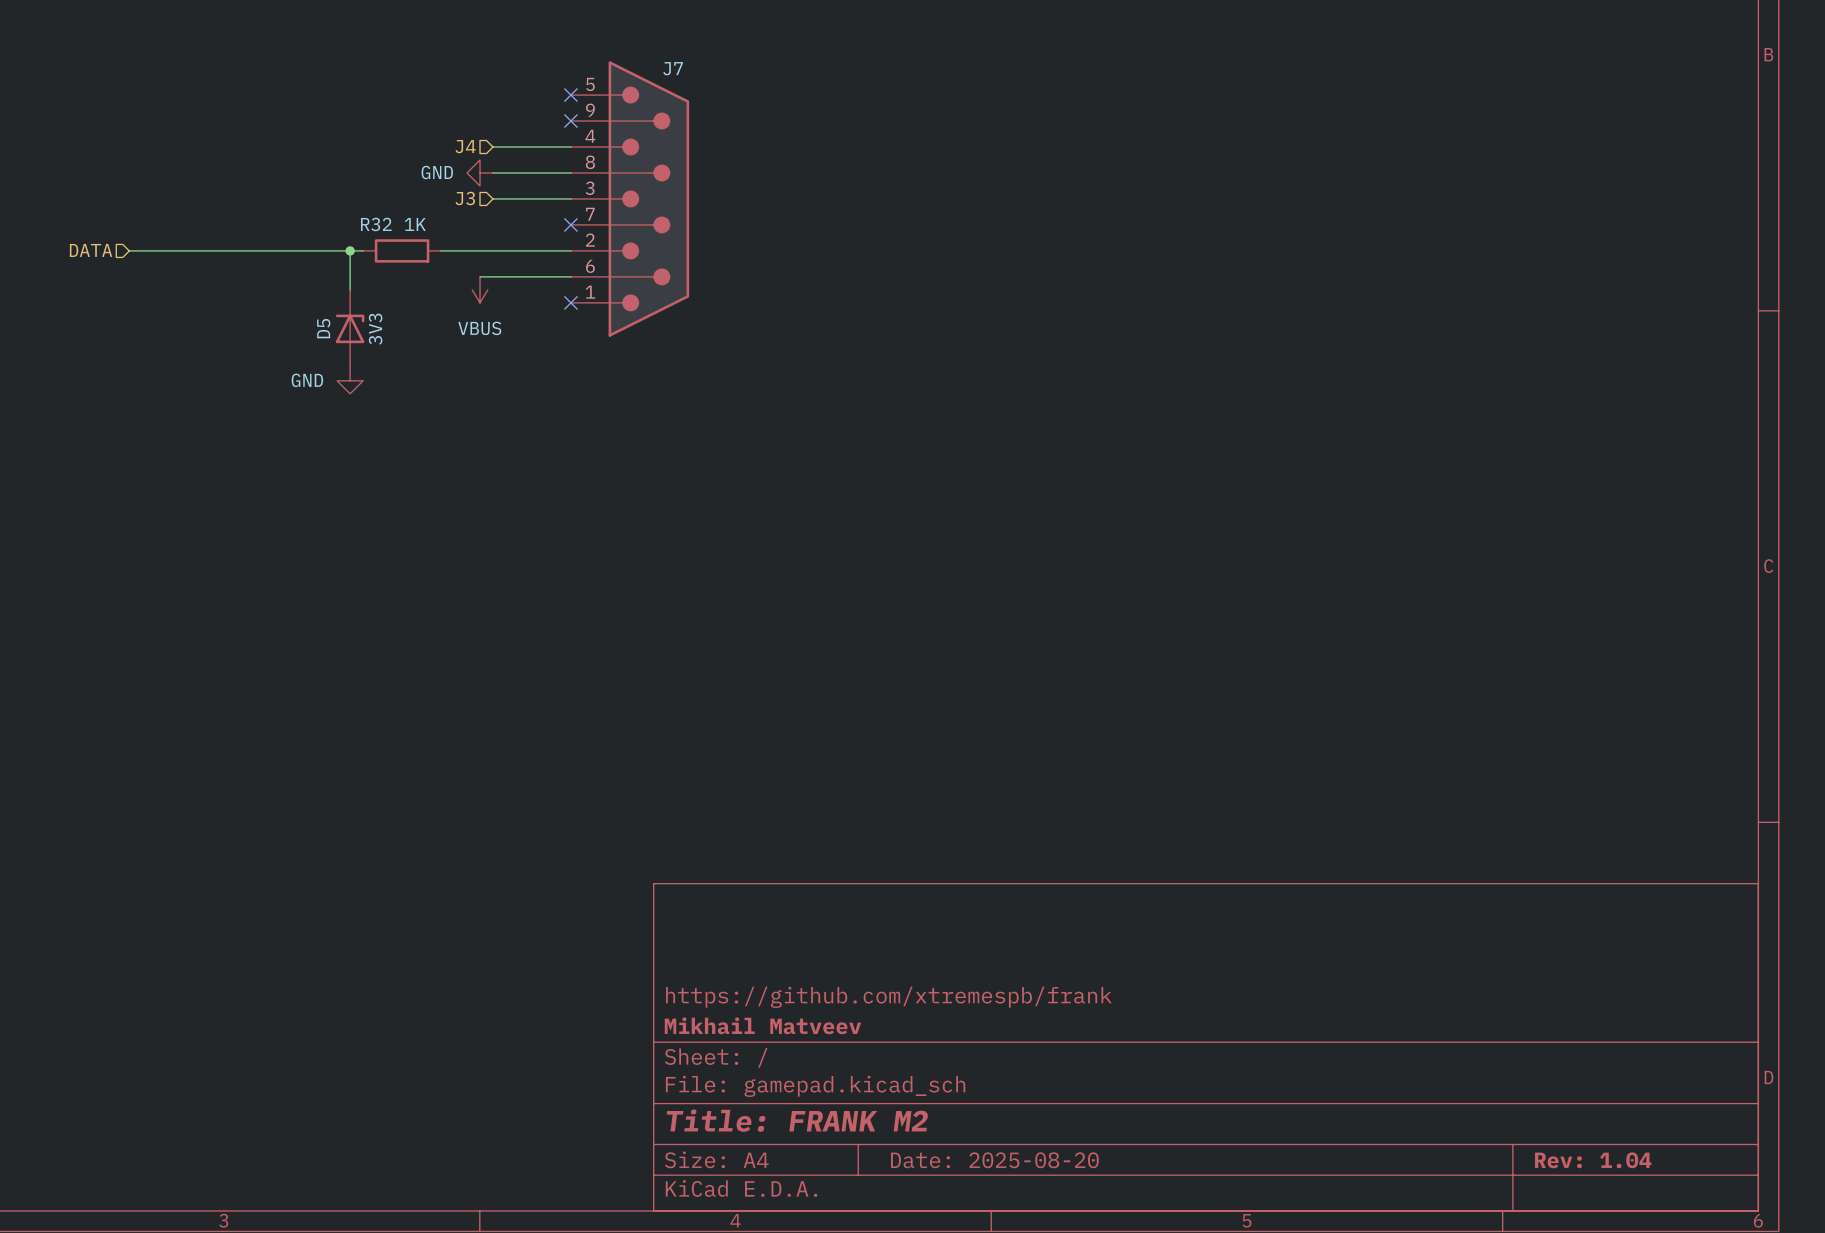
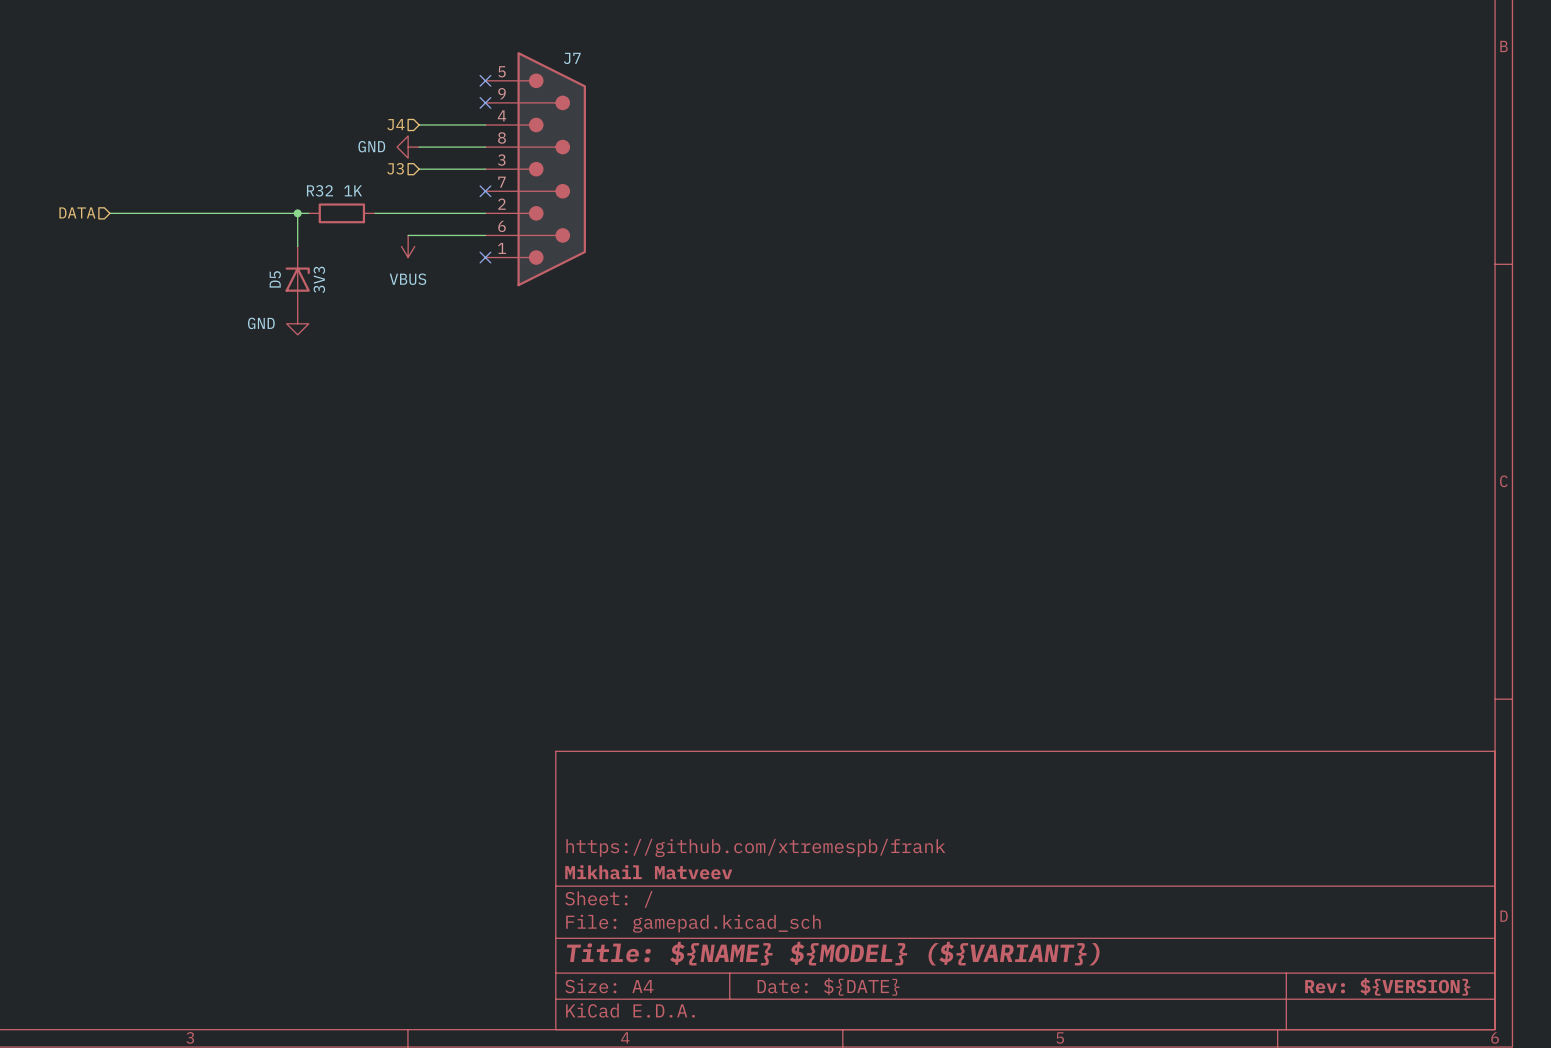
title block: Title: FRANK M2 (797, 1120) -> Title: ${NAME} ${MODEL} (${VARIANT}) (833, 953)
title block: Date: 2025-08-20 (994, 1160) -> Date: ${DATE} (828, 986)
title block: Rev: 1.04 (1593, 1160) -> Rev: ${VERSION} (1387, 986)

